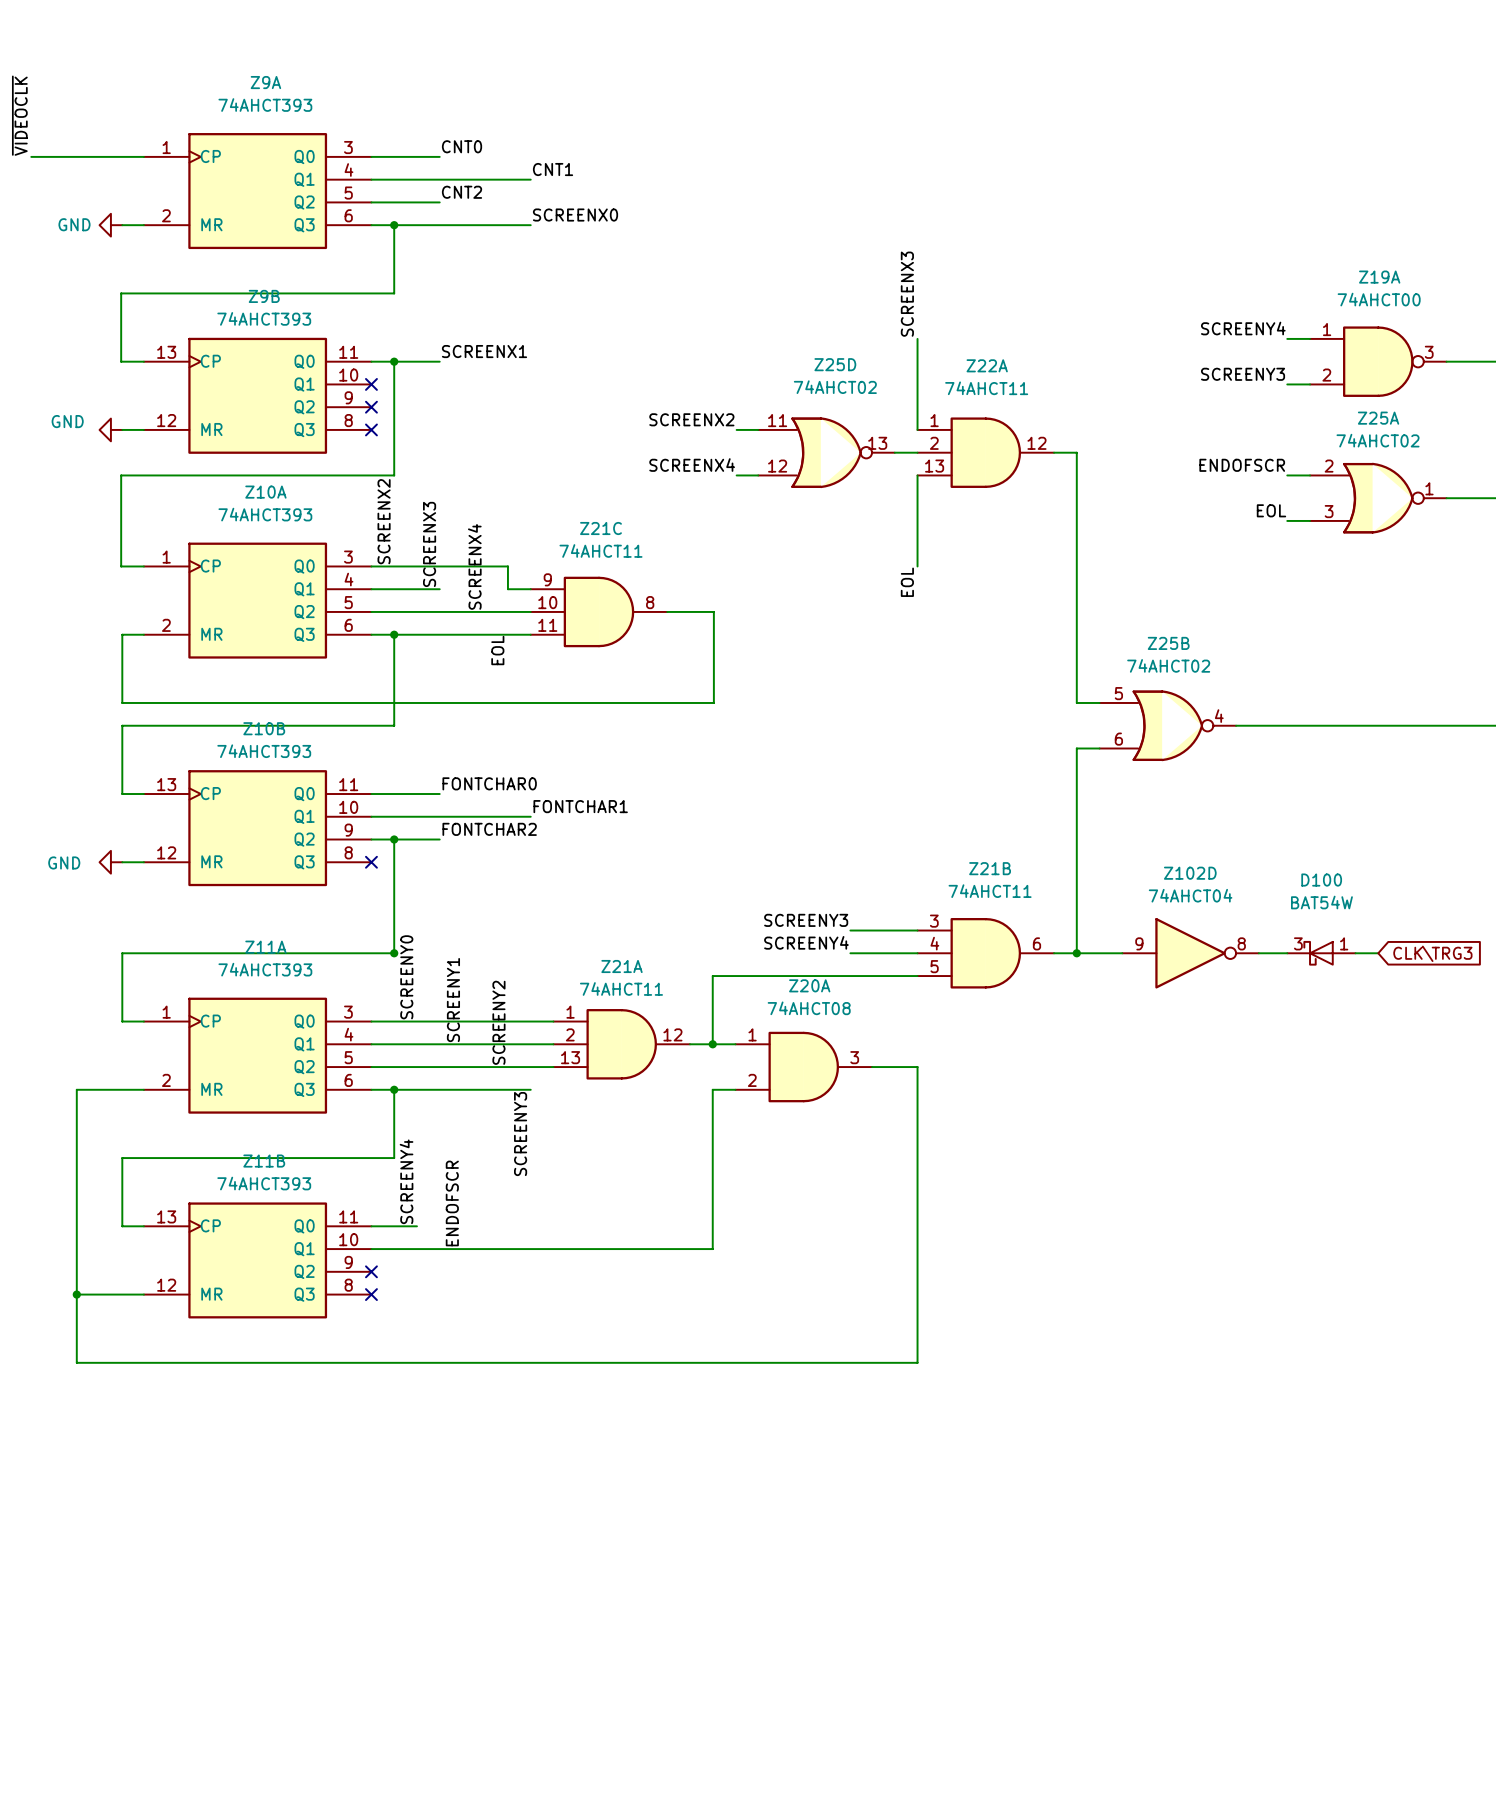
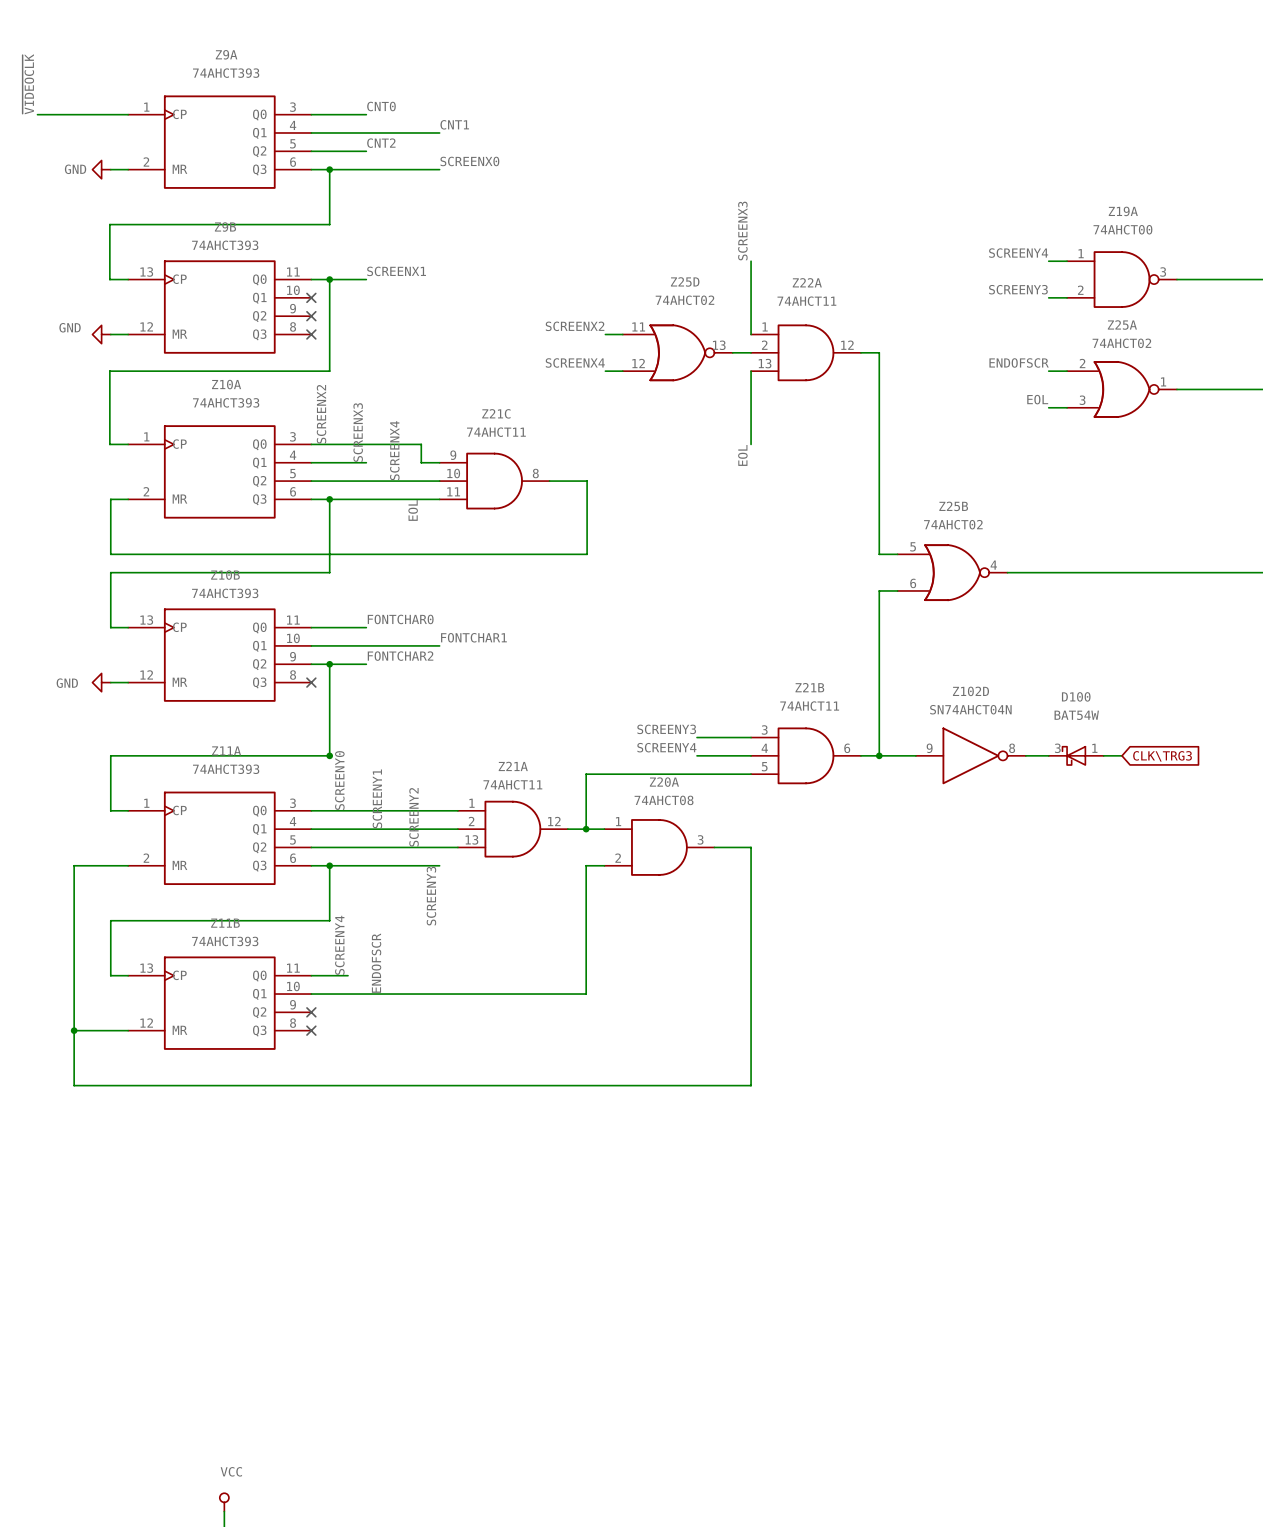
Z102D value: 74AHCT04 (1190, 895) -> SN74AHCT04N (970, 709)

